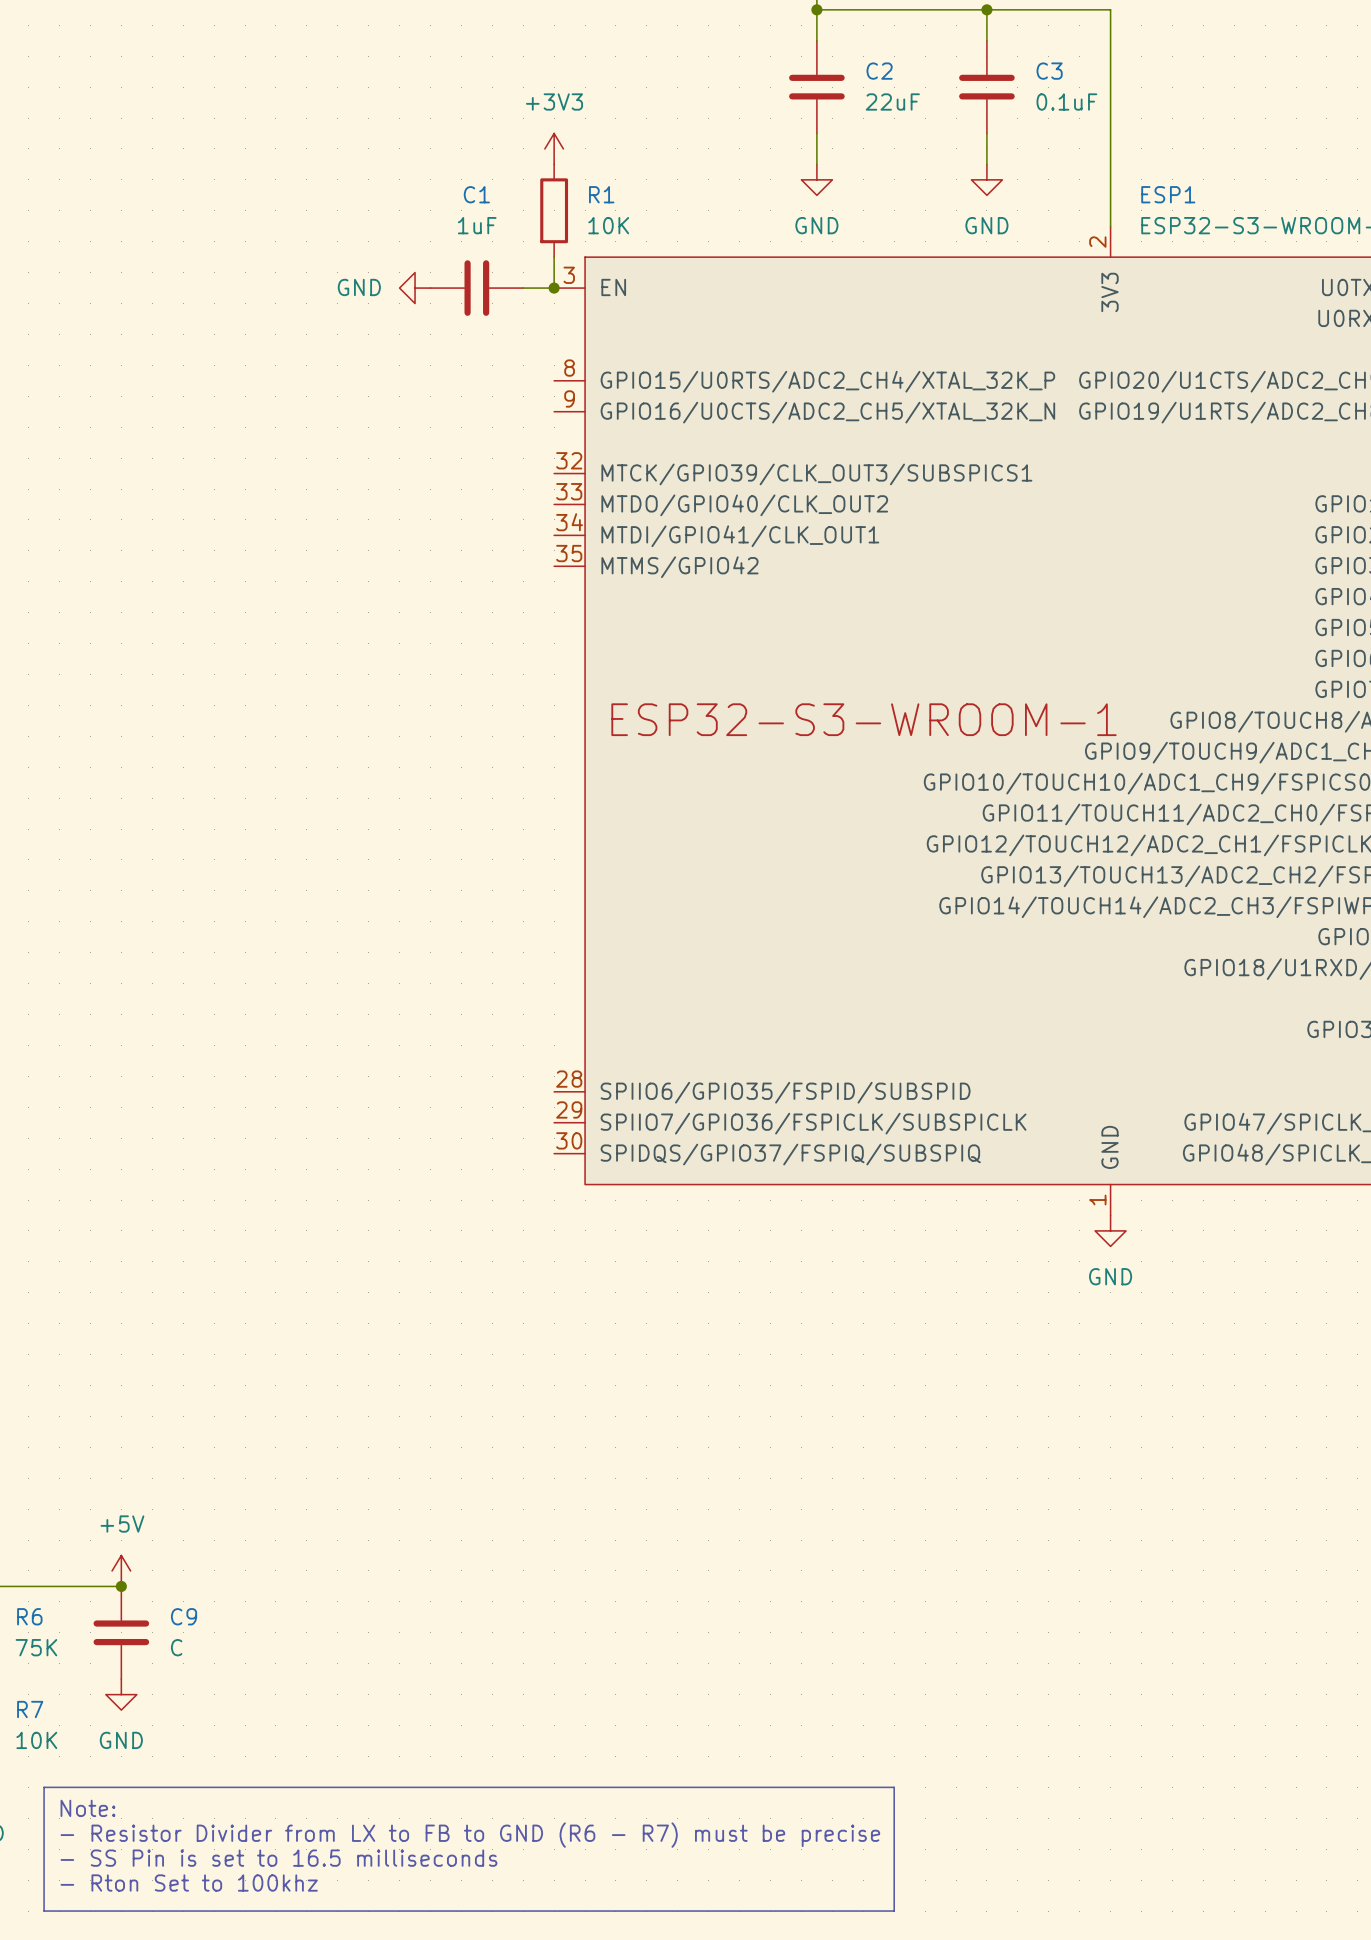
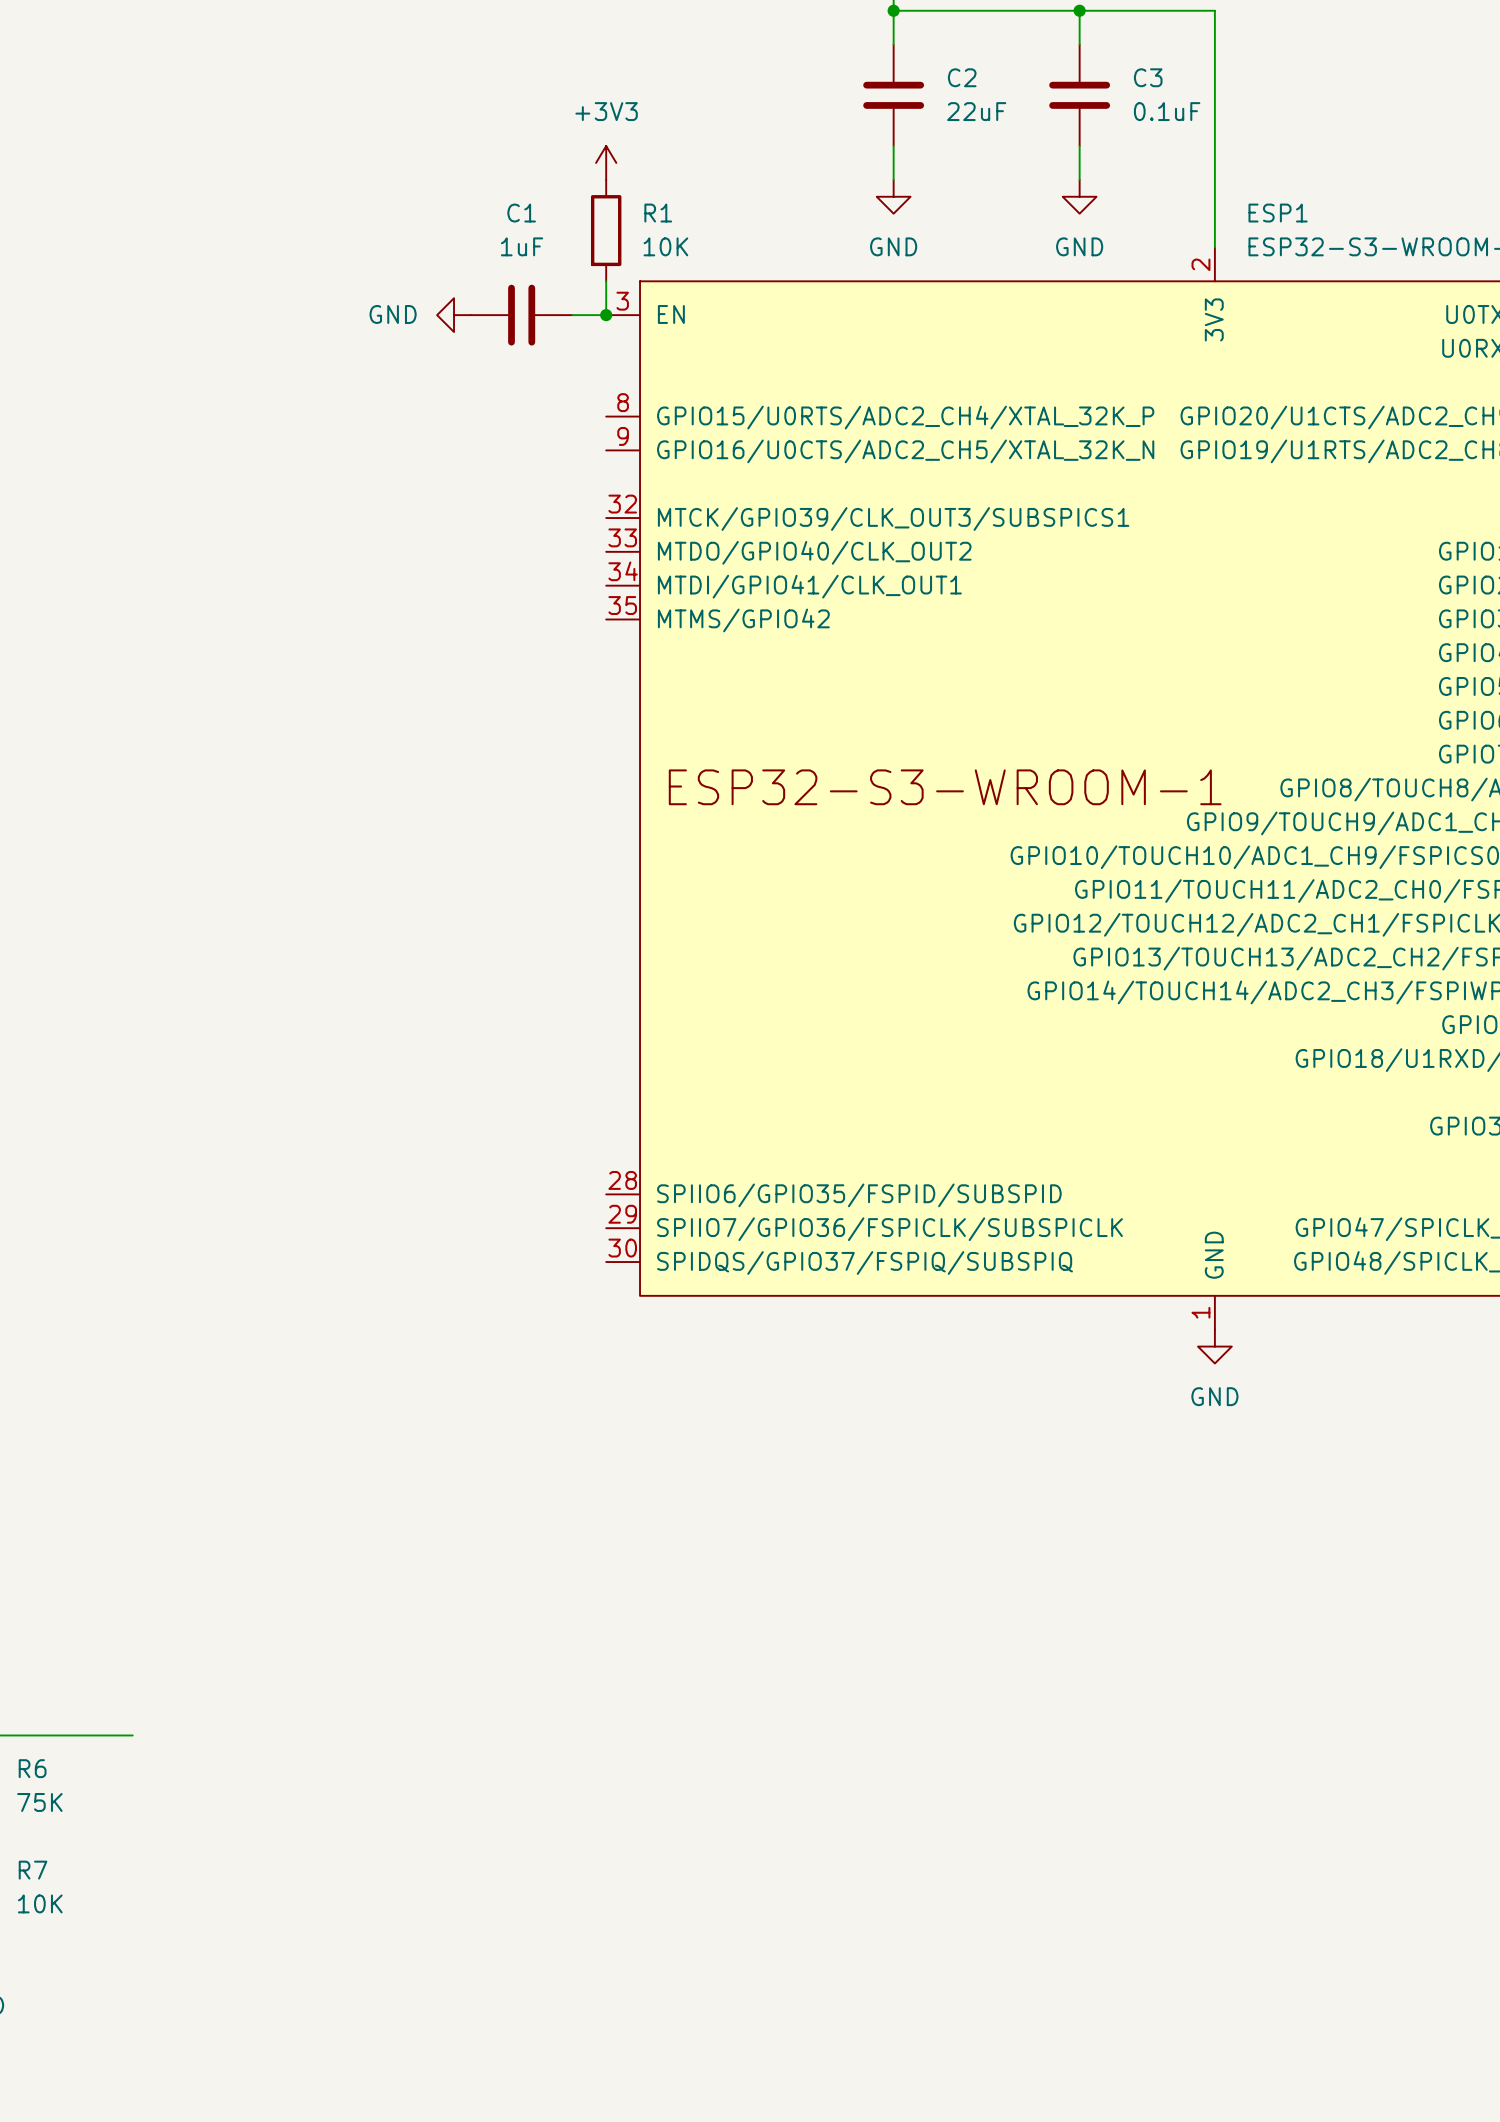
power symbol: +5V (121, 1570) -> none
junction: (121, 1586) -> none
C9: C (121, 1632) -> none
power symbol: GND (121, 1694) -> none
line: (44, 1787) (894, 1787) (894, 1911) (44, 1911) (44, 1787) -> none
text: Note: (87, 1808) -> none
text: - Resistor Divider from LX to FB to GND (R6 - R7) must be precise (470, 1835) -> none
text: - SS Pin is set to 16.5 milliseconds (278, 1858) -> none
text: - Rton Set to 100khz (189, 1883) -> none

